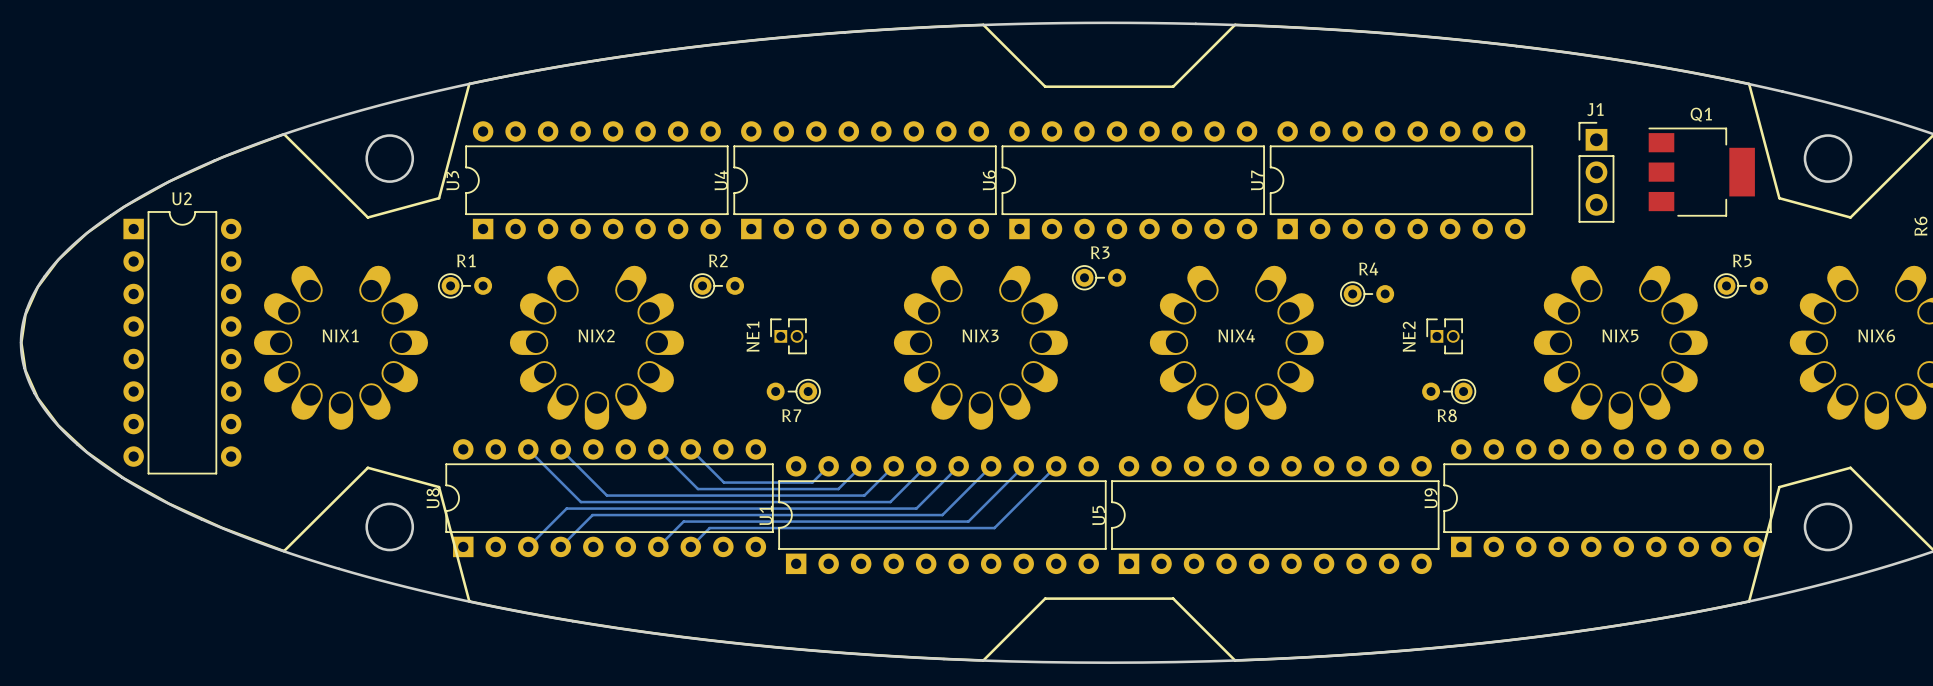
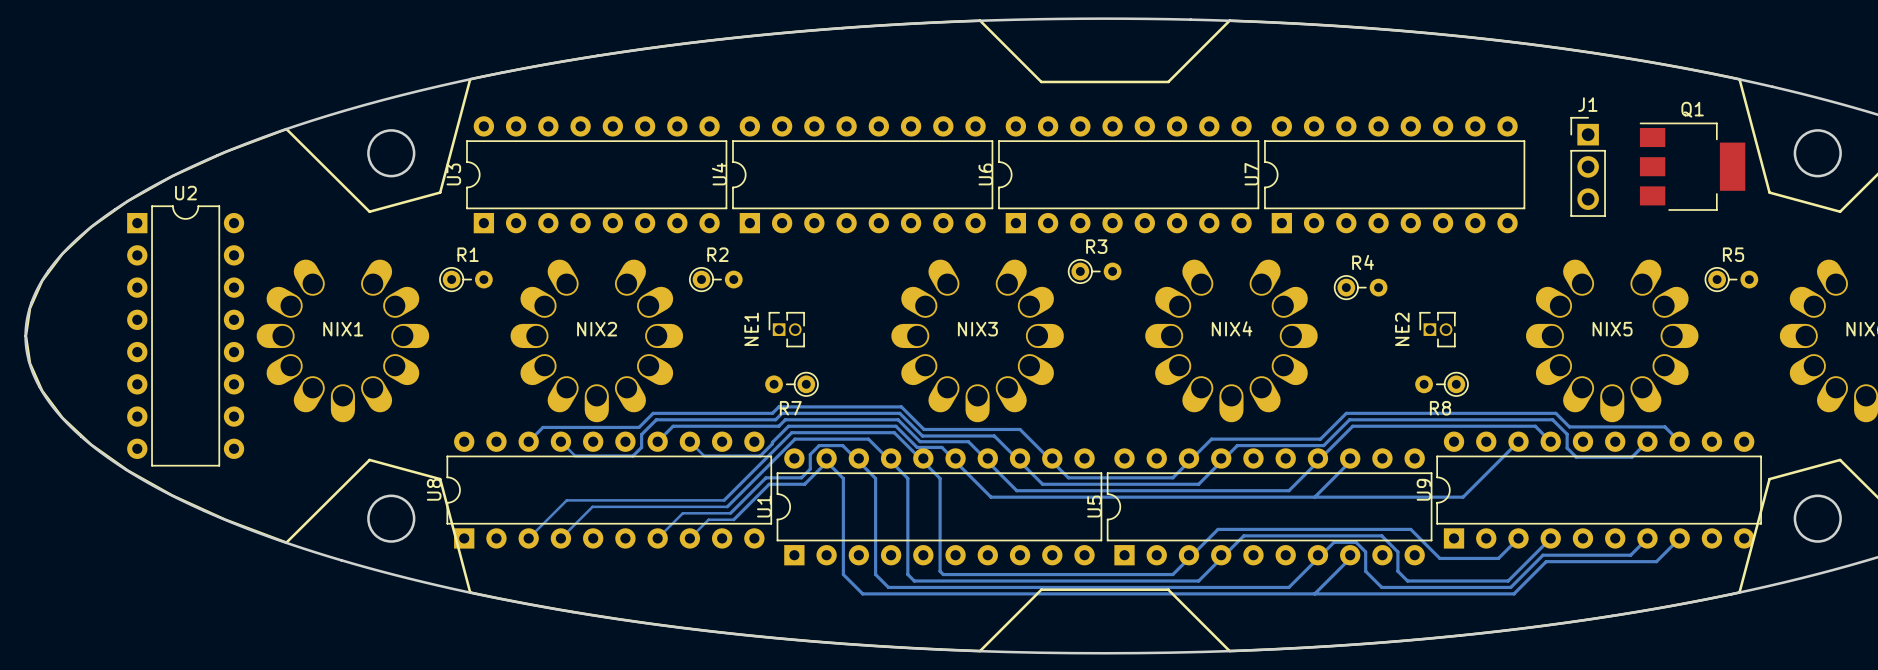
bottom track: (528, 449) (580, 502) (890, 502) (926, 466) -> (528, 441) (542, 427) (639, 427) (653, 413) (772, 413) (778, 406) (901, 406) (924, 429) (1020, 429) (1068, 477) (1172, 477) (1211, 439) (1320, 439) (1346, 413) (1555, 413) (1569, 426) (1664, 426) (1679, 441)
bottom track: (658, 449) (697, 489) (838, 489) (861, 466) -> (657, 441) (673, 426) (778, 426) (785, 419) (898, 419) (920, 441) (968, 441) (1016, 490) (1288, 490) (1352, 426) (1535, 426) (1550, 441)
bottom track: (575, 463) (606, 495) (864, 495) (893, 466) -> (575, 456) (633, 456) (641, 447) (641, 434) (656, 419) (775, 419) (782, 413) (899, 413) (922, 436) (994, 436) (1042, 484) (1198, 484) (1237, 445) (1323, 445) (1349, 419) (1552, 419) (1567, 434) (1567, 448) (1576, 457) (1632, 457) (1647, 441)
bottom track: (705, 463) (723, 482) (812, 482) (828, 466) -> (704, 456) (760, 456) (788, 426) (895, 426) (917, 447) (941, 447) (991, 497) (1463, 497) (1518, 441)
bottom track: (958, 466) (916, 508) (725, 508) -> (1518, 538) (1498, 558) (1439, 558) (1410, 529) (1218, 529) (1172, 574) (943, 574) (940, 571) (940, 478) (894, 432) (791, 432) (724, 500)
bottom track: (991, 466) (942, 515) (728, 515) -> (1550, 538) (1508, 581) (1407, 581) (1397, 571) (1397, 551) (1381, 535) (1243, 535) (1198, 581) (914, 581) (907, 574) (907, 478) (868, 439) (795, 439) (727, 506)
bottom track: (1023, 466) (968, 521) (731, 521) -> (1647, 538) (1630, 555) (1543, 555) (1510, 587) (1381, 587) (1365, 571) (1365, 551) (1356, 542) (1334, 542) (1288, 587) (888, 587) (875, 574) (875, 478) (842, 445) (819, 445) (810, 454) (810, 469) (801, 477) (765, 477) (730, 513)
bottom track: (1056, 466) (994, 528) (735, 528) -> (1679, 538) (1656, 561) (1546, 561) (1513, 593) (862, 593) (843, 574) (843, 478) (826, 461) (804, 484) (769, 484) (733, 519)
bottom track: none -> (1350, 461) (1314, 497)
bottom track: none -> (1350, 558) (1314, 593)

